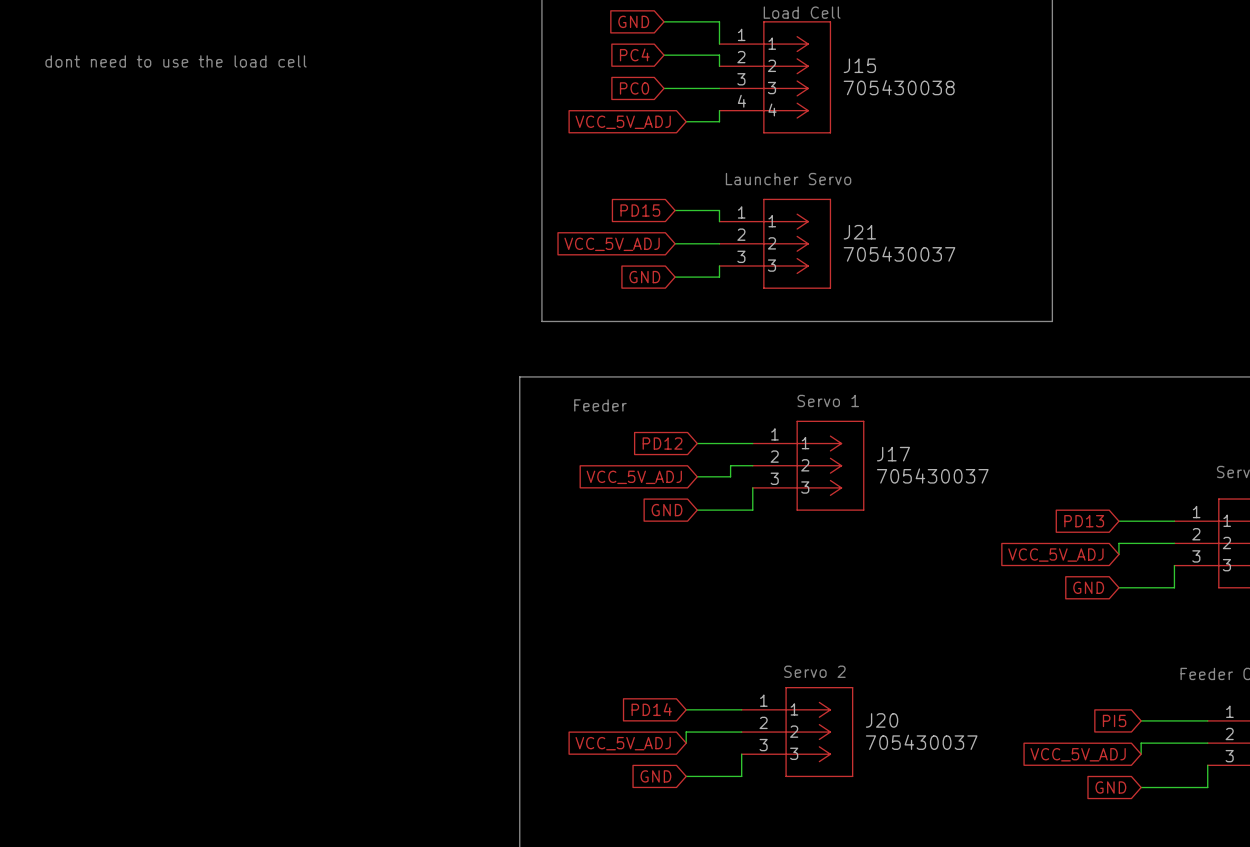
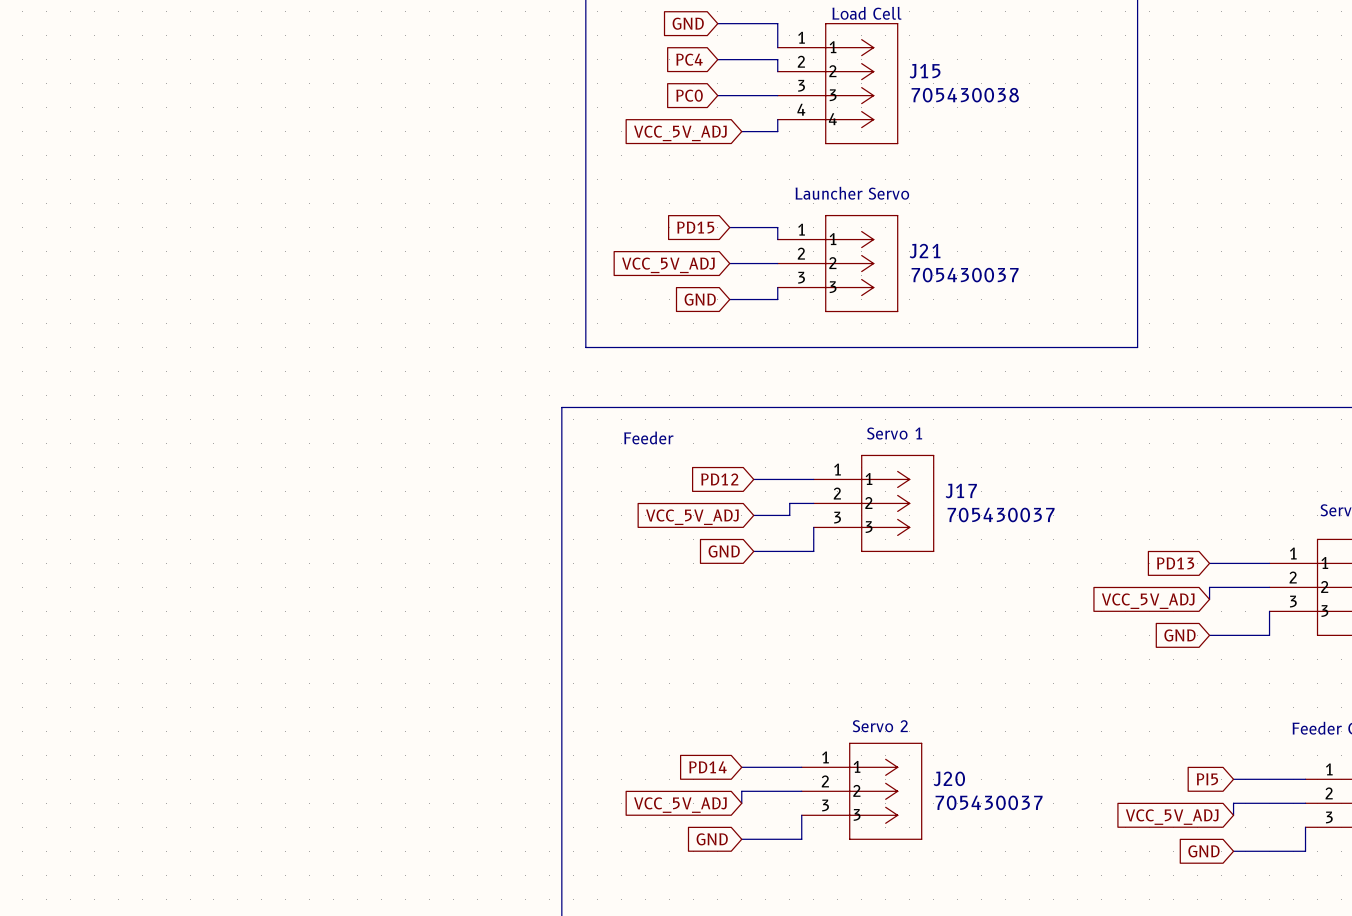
text: dont need to use the load cell (176, 61) -> none

